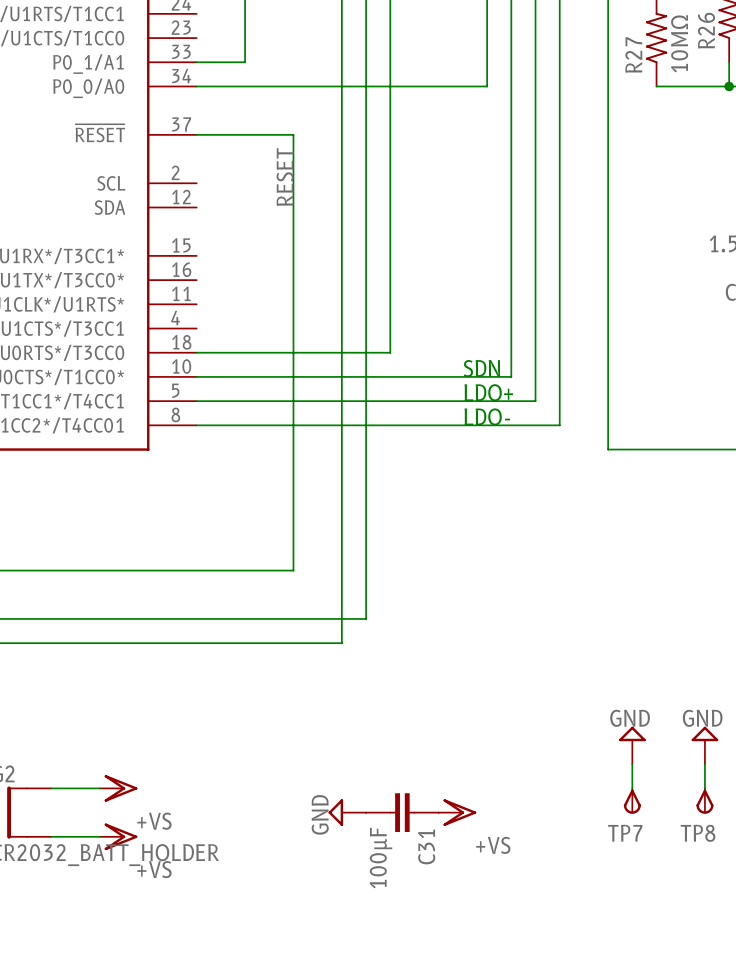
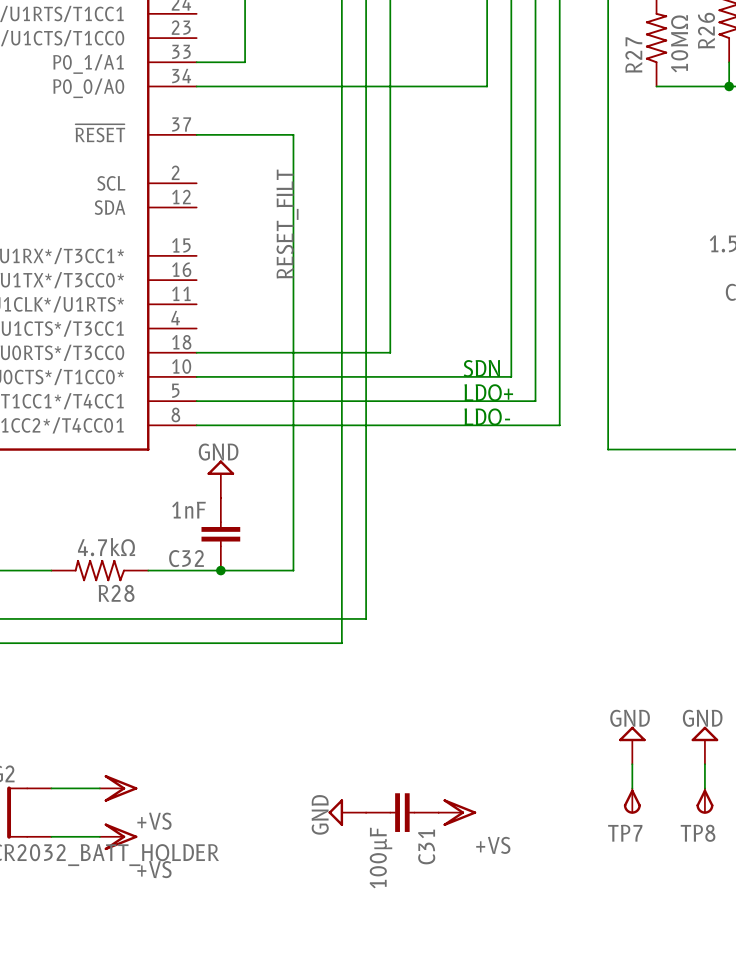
label: RESET (285, 177) -> RESET_FILT (287, 224)
power symbol: none -> GND (220, 479)
C32: none -> 1nF (220, 534)
R28: none -> 4.7kΩ (99, 570)
junction: none -> (220, 570)

